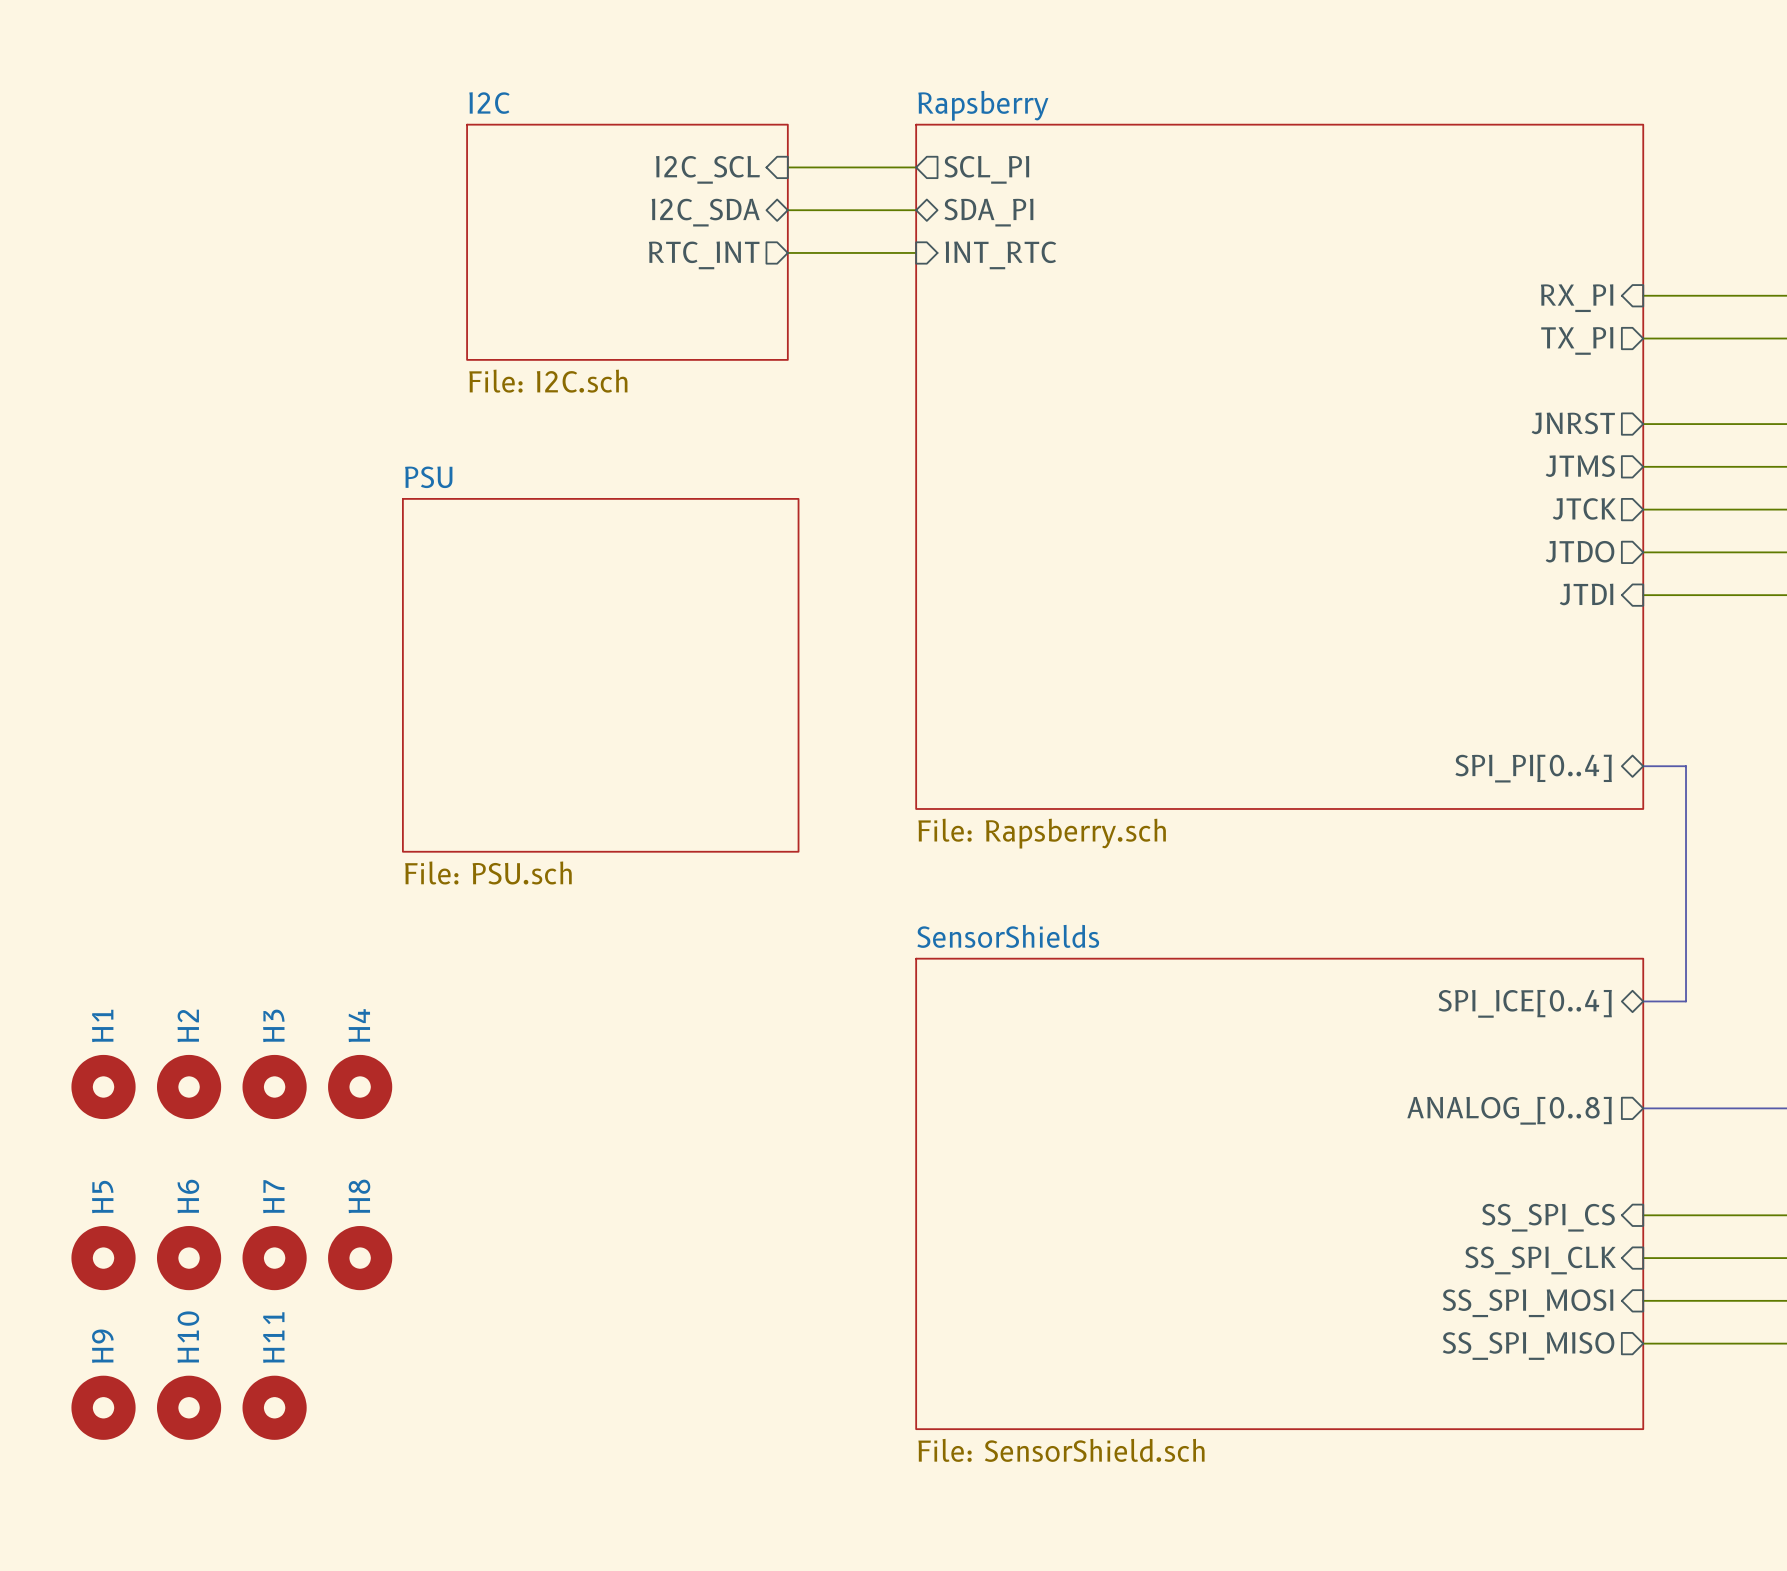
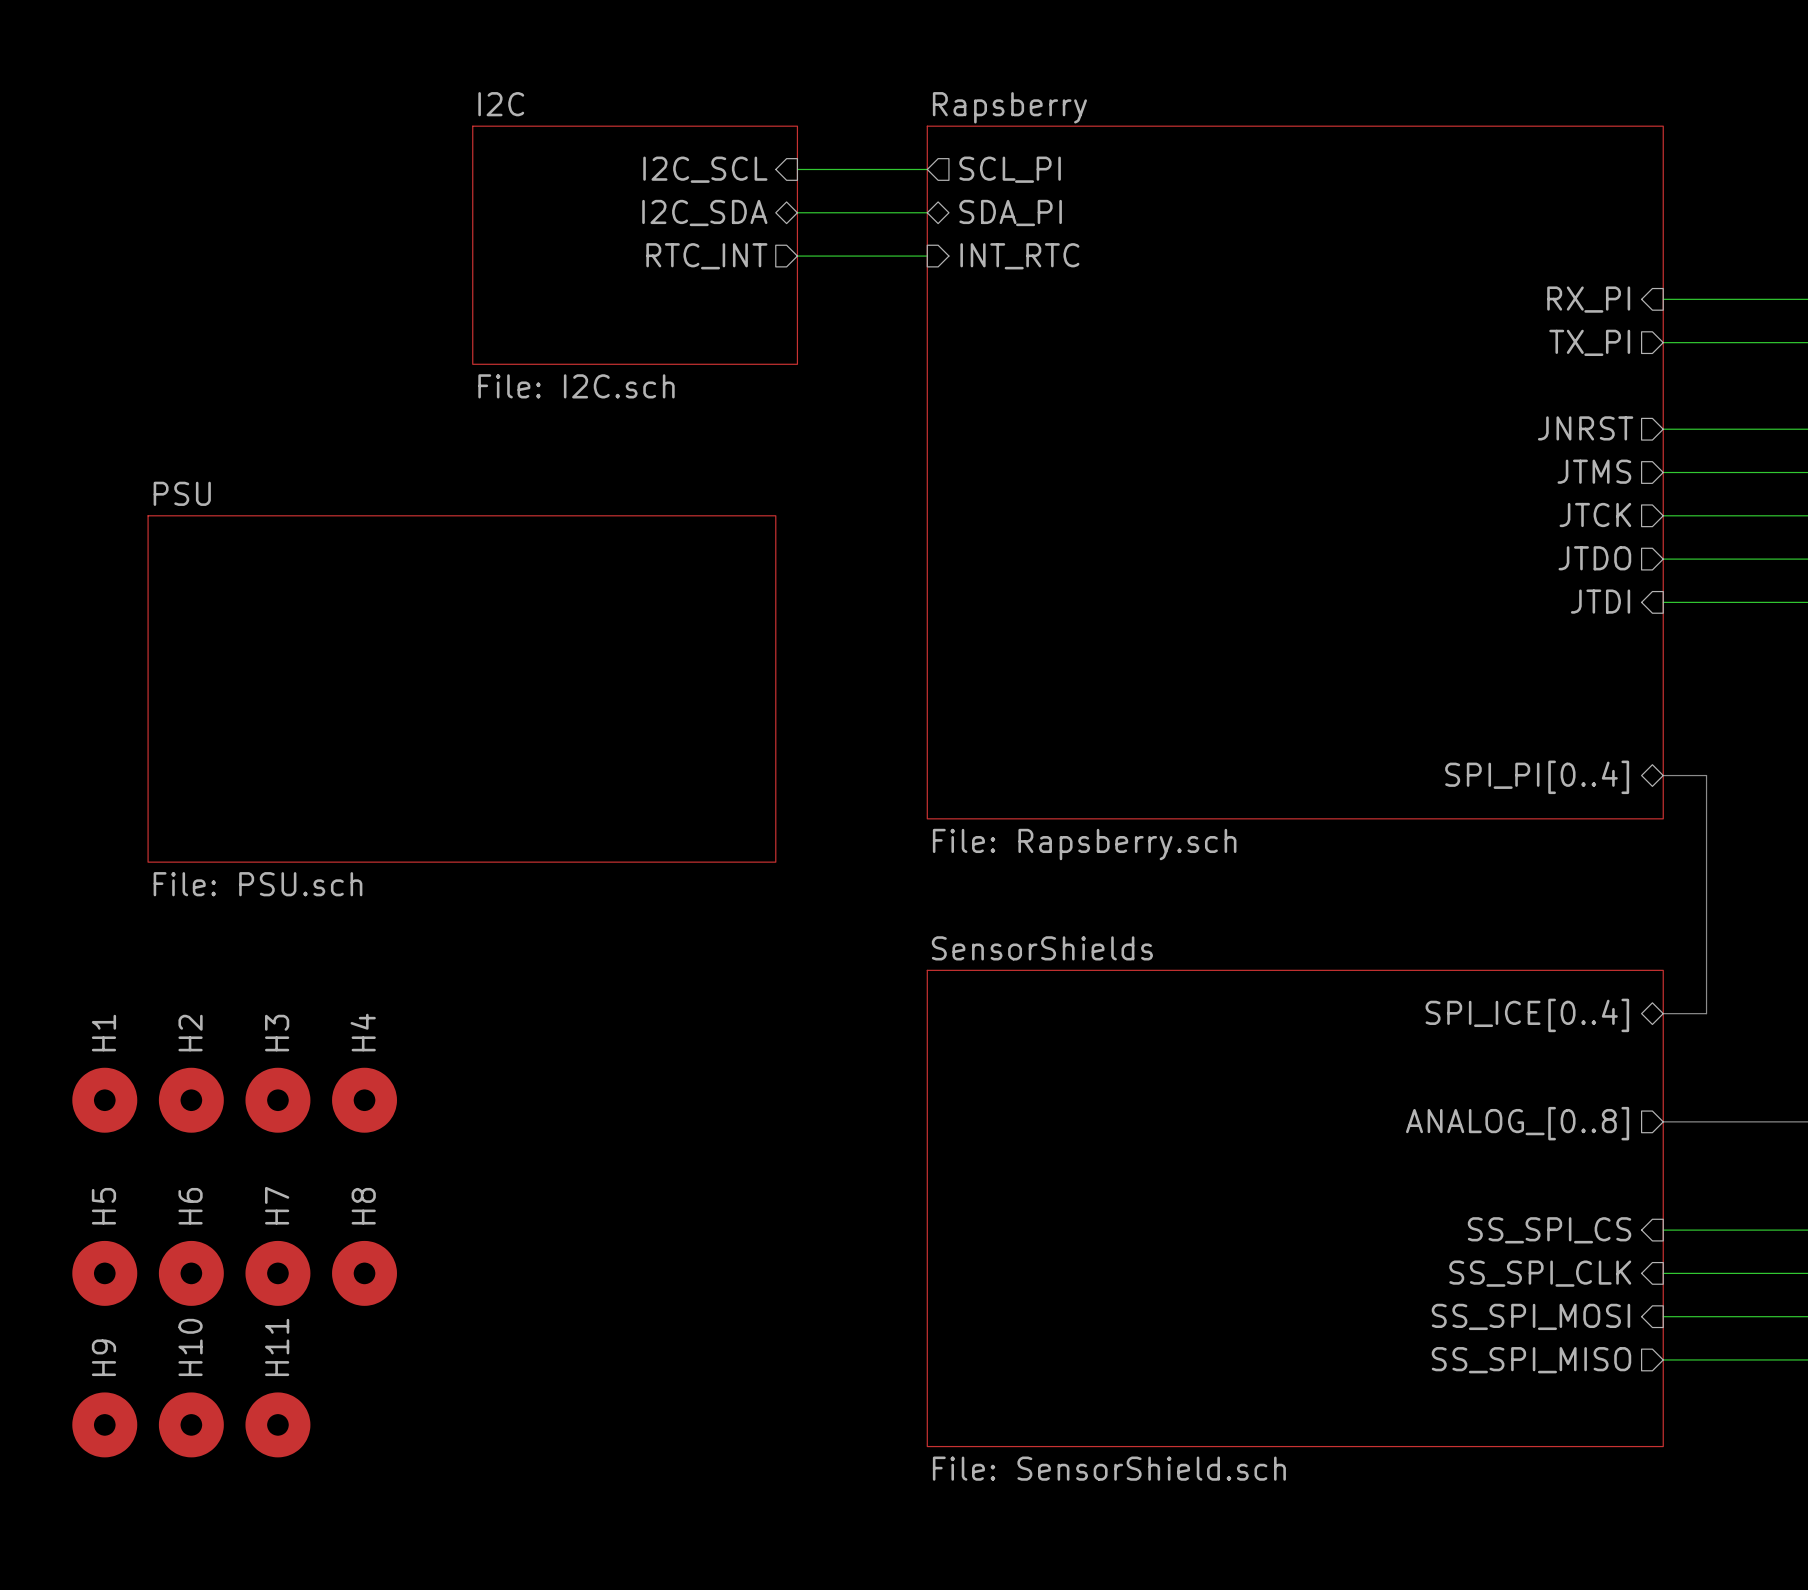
sheet PSU: File: PSU.sch (600, 675) -> none
sheet PSU: none -> File: PSU.sch (461, 688)

